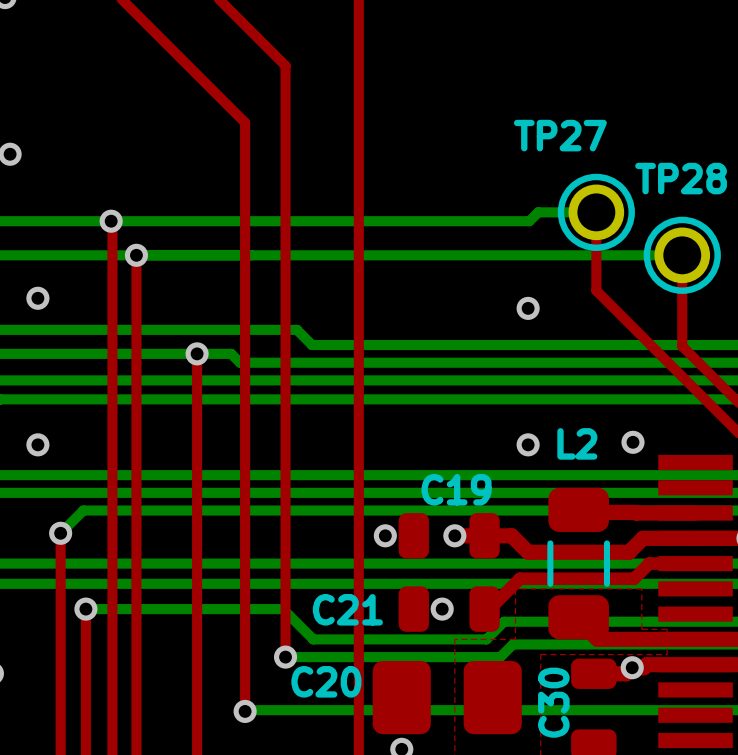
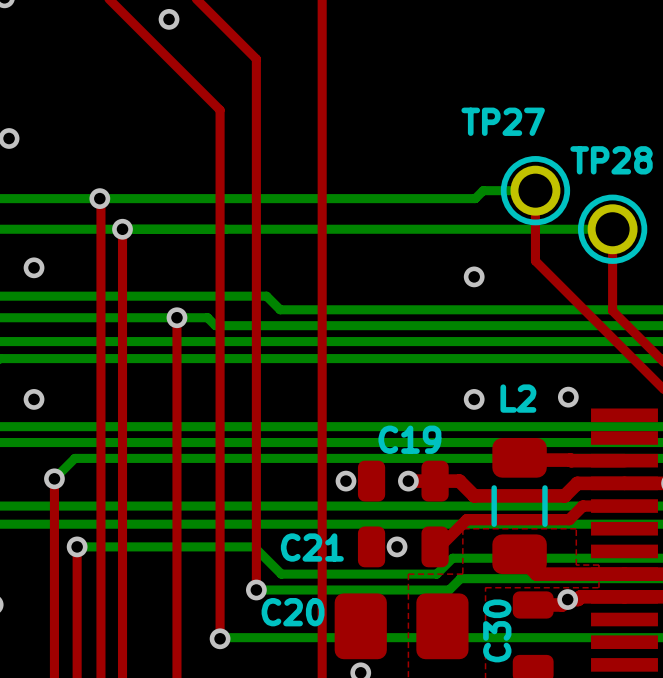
via: none -> (169, 19)

